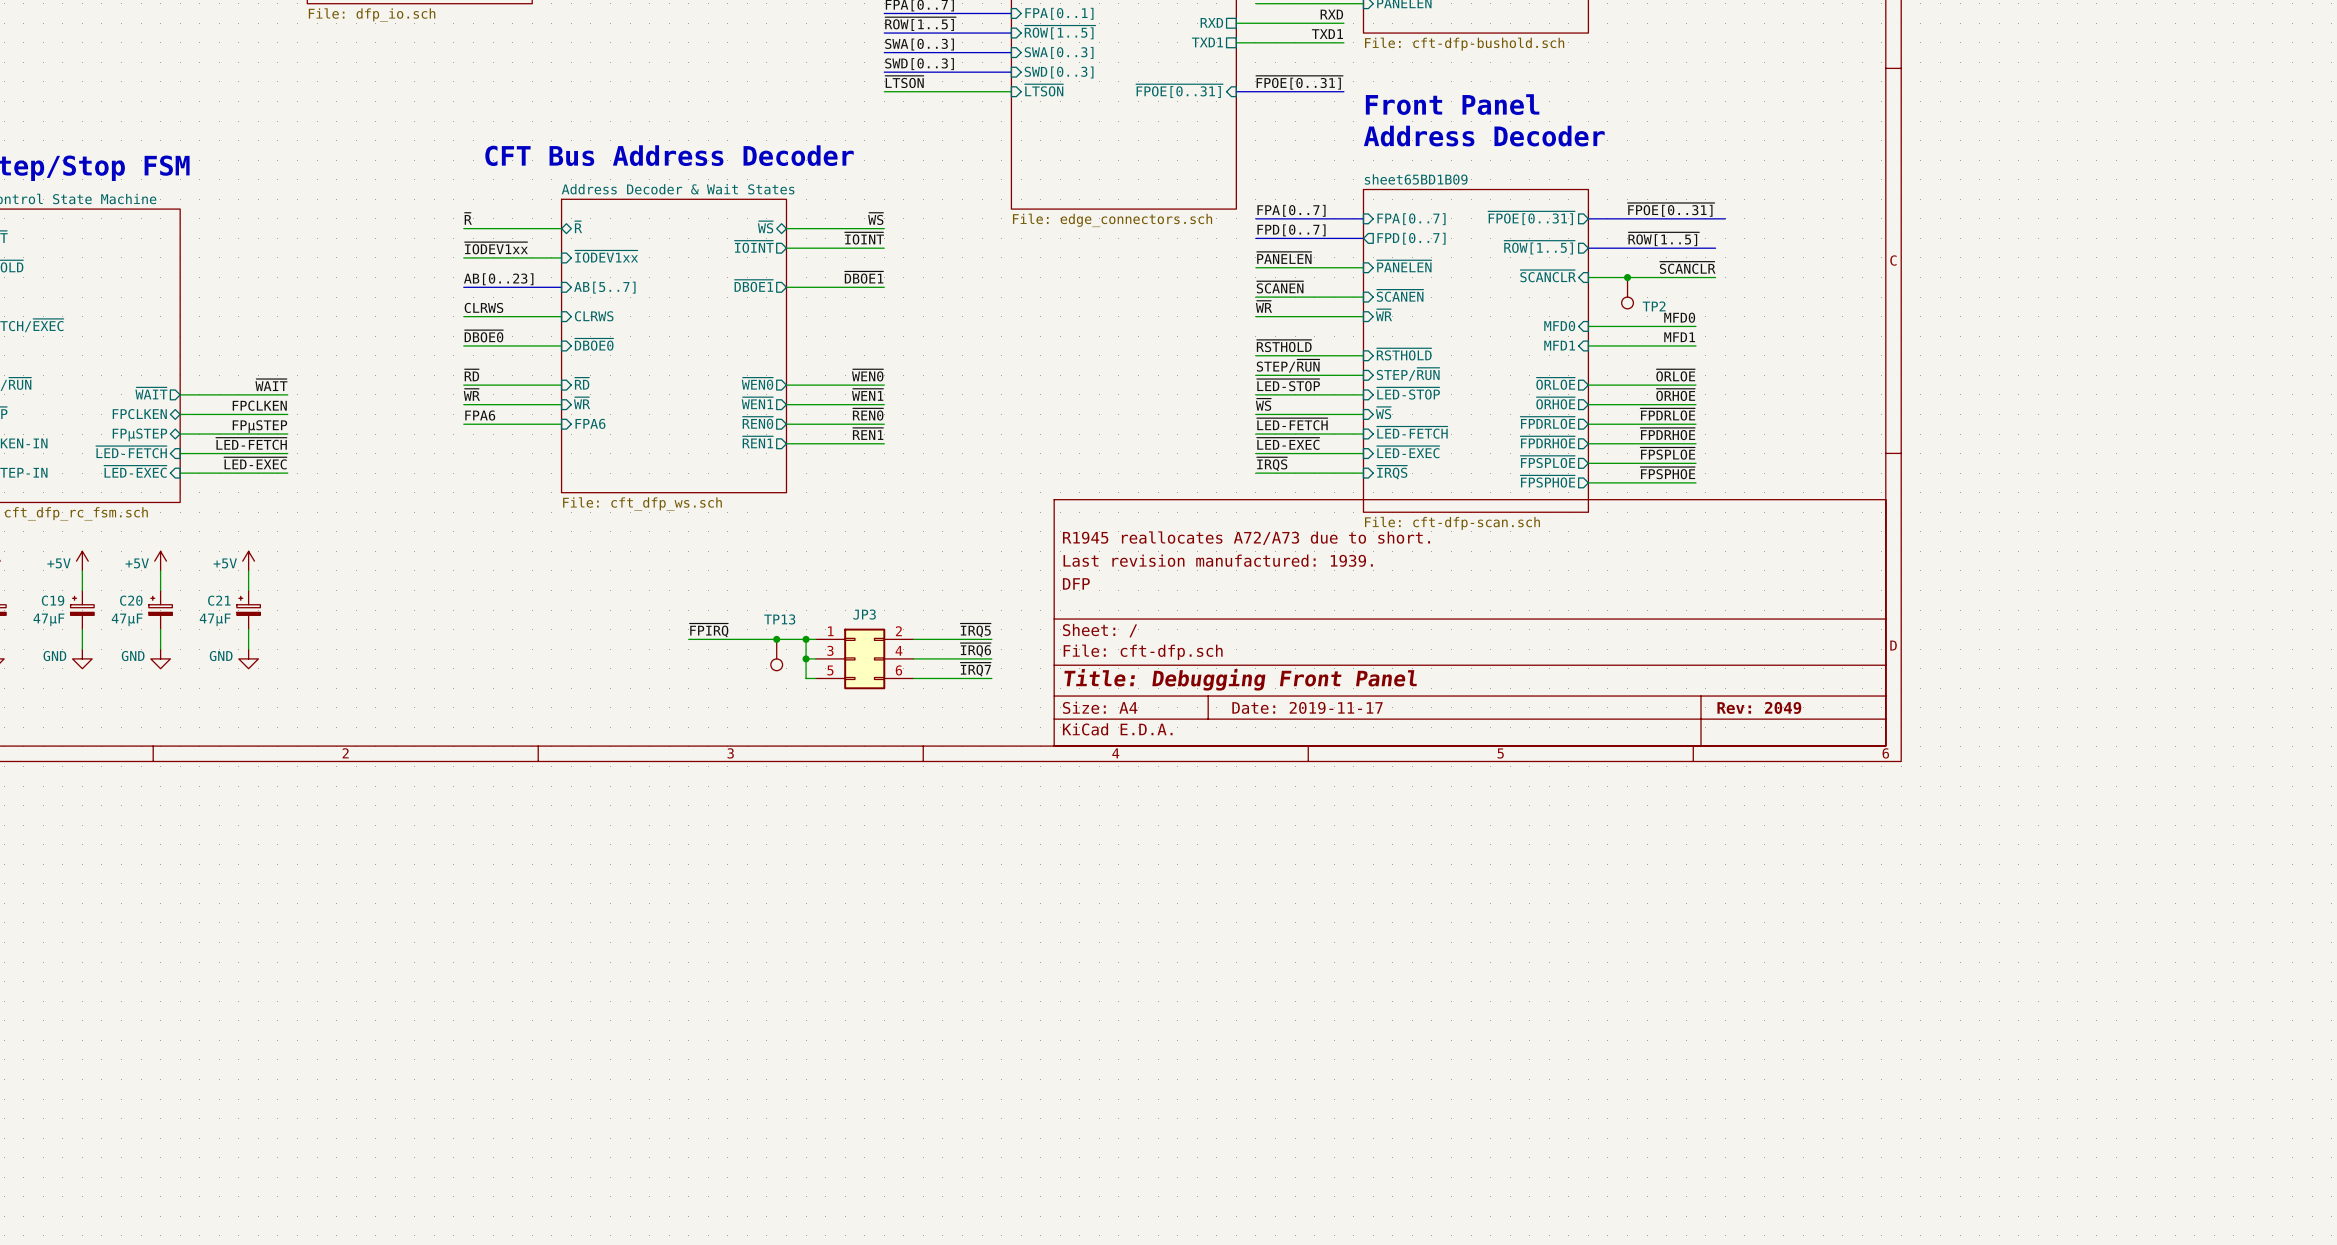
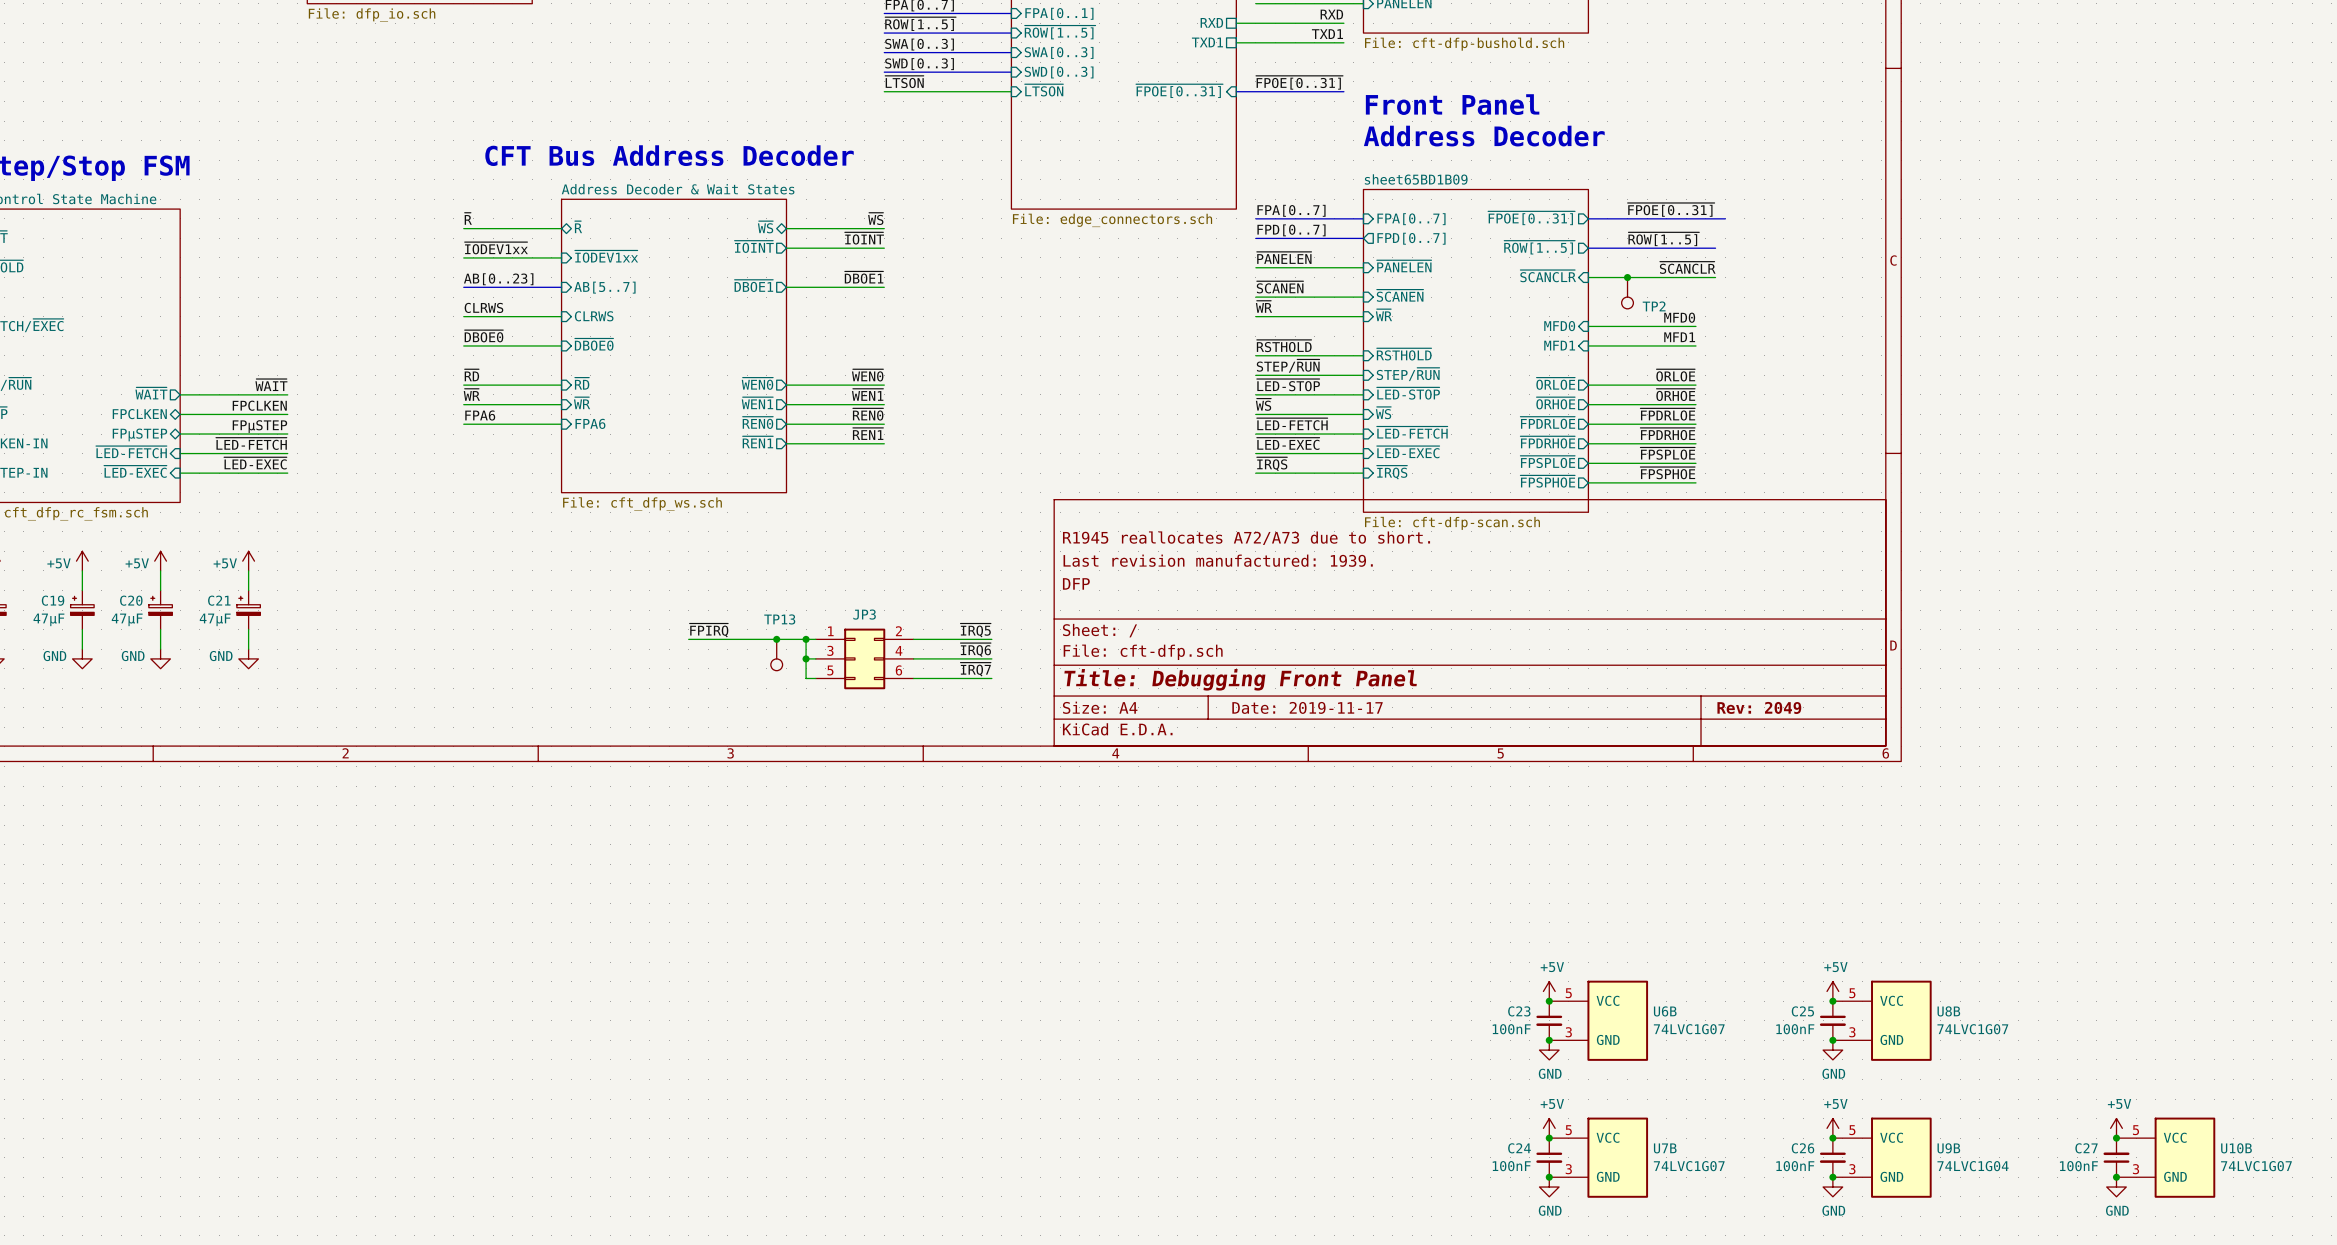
power symbol: none -> +5V (1549, 991)
power symbol: none -> +5V (1832, 991)
junction: none -> (1549, 1001)
junction: none -> (1832, 1001)
C23: none -> 100nF (1549, 1020)
U6B: none -> 74LVC1G07 (1598, 1020)
C25: none -> 100nF (1832, 1020)
U8B: none -> 74LVC1G07 (1882, 1020)
junction: none -> (1549, 1040)
junction: none -> (1832, 1040)
power symbol: none -> GND (1549, 1050)
power symbol: none -> GND (1832, 1050)
power symbol: none -> +5V (1549, 1128)
power symbol: none -> +5V (1832, 1128)
power symbol: none -> +5V (2116, 1128)
junction: none -> (1549, 1138)
junction: none -> (1832, 1138)
junction: none -> (2116, 1138)
C24: none -> 100nF (1549, 1157)
U7B: none -> 74LVC1G07 (1598, 1157)
C26: none -> 100nF (1832, 1157)
U9B: none -> 74LVC1G04 (1882, 1157)
C27: none -> 100nF (2116, 1157)
U10B: none -> 74LVC1G07 (2165, 1157)
junction: none -> (1549, 1177)
junction: none -> (1832, 1177)
junction: none -> (2116, 1177)
power symbol: none -> GND (1549, 1187)
power symbol: none -> GND (1832, 1187)
power symbol: none -> GND (2116, 1187)

